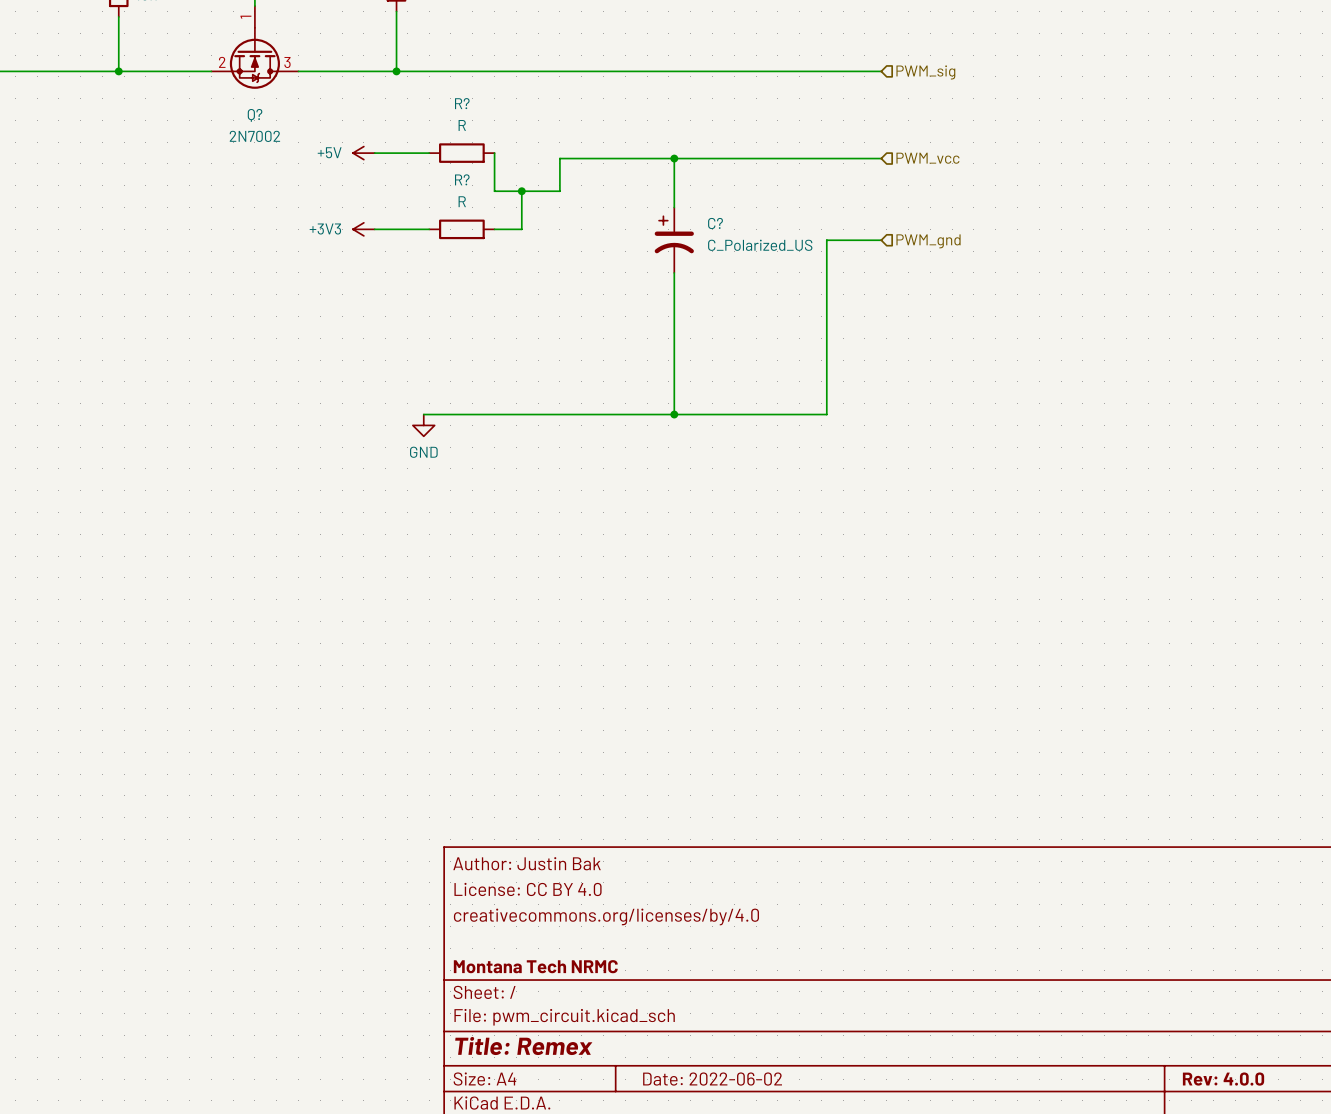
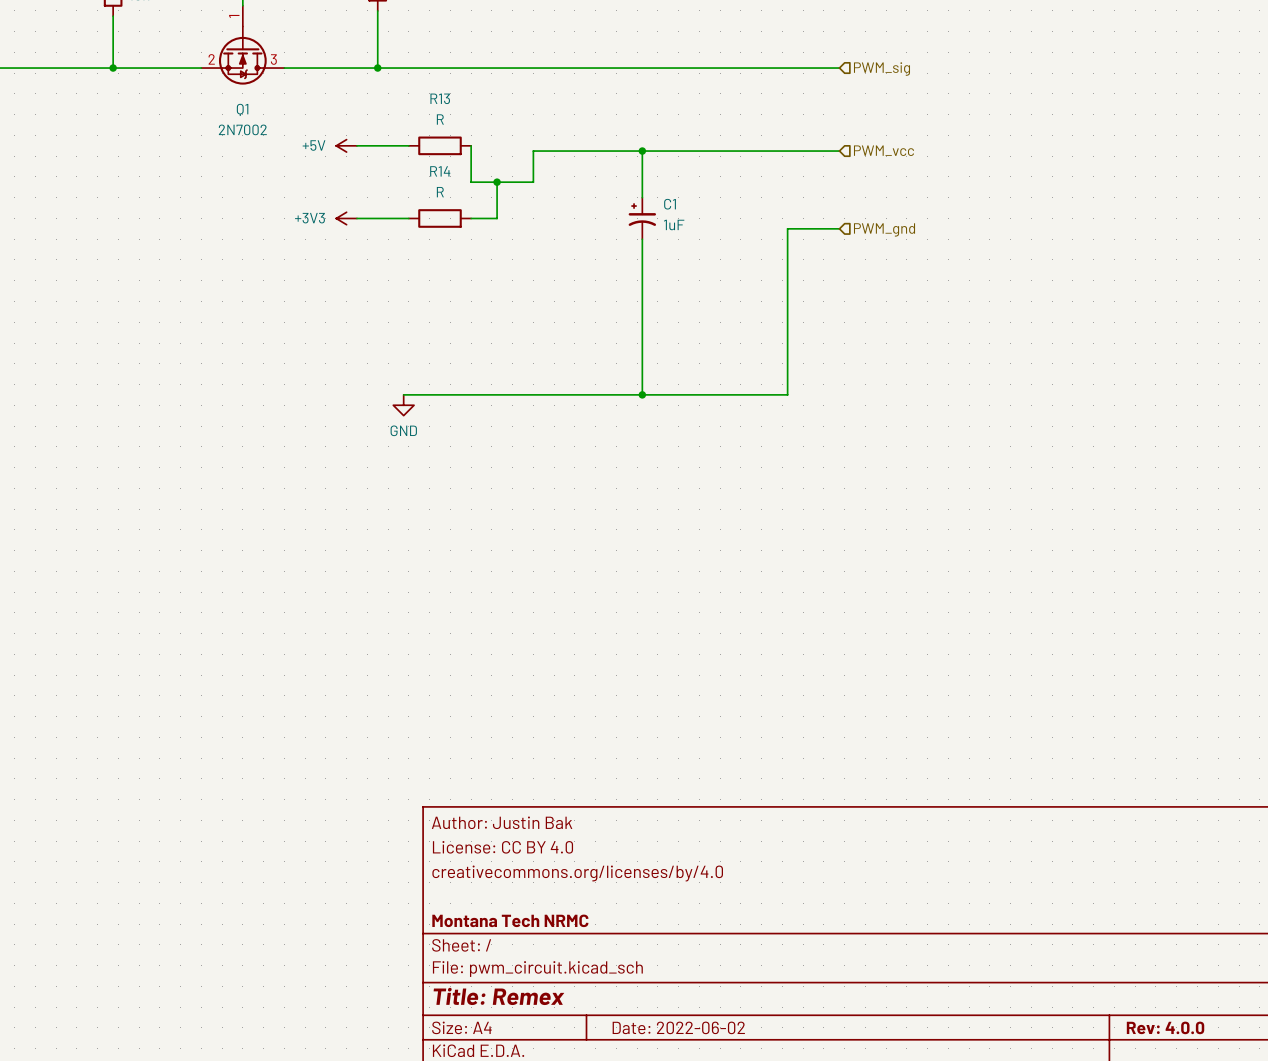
R? name: R? (462, 103) -> R13 (440, 98)
Q? name: Q? (255, 115) -> Q1 (242, 109)
R? name: R? (462, 179) -> R14 (440, 171)
C1: none -> 1uF (642, 218)
C?: C_Polarized_US (674, 240) -> none

